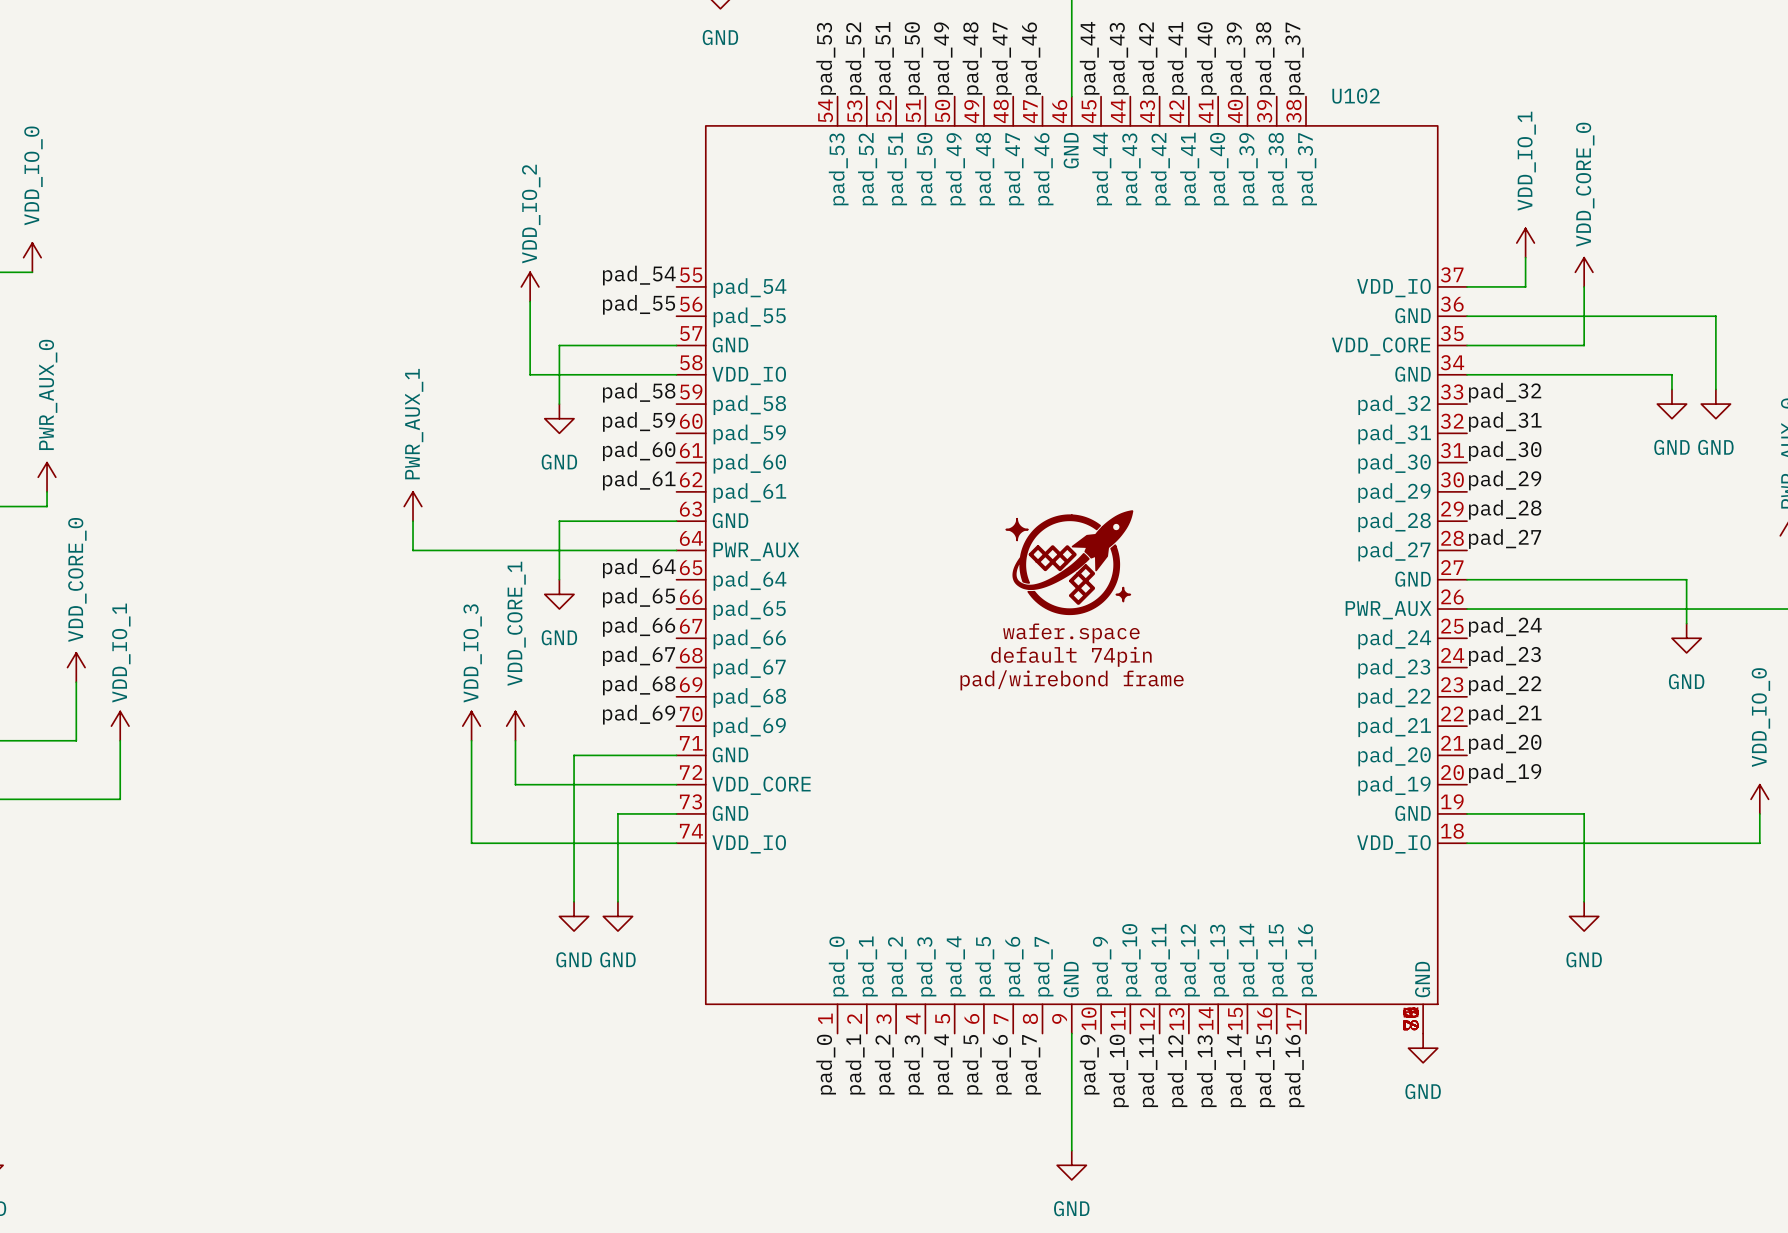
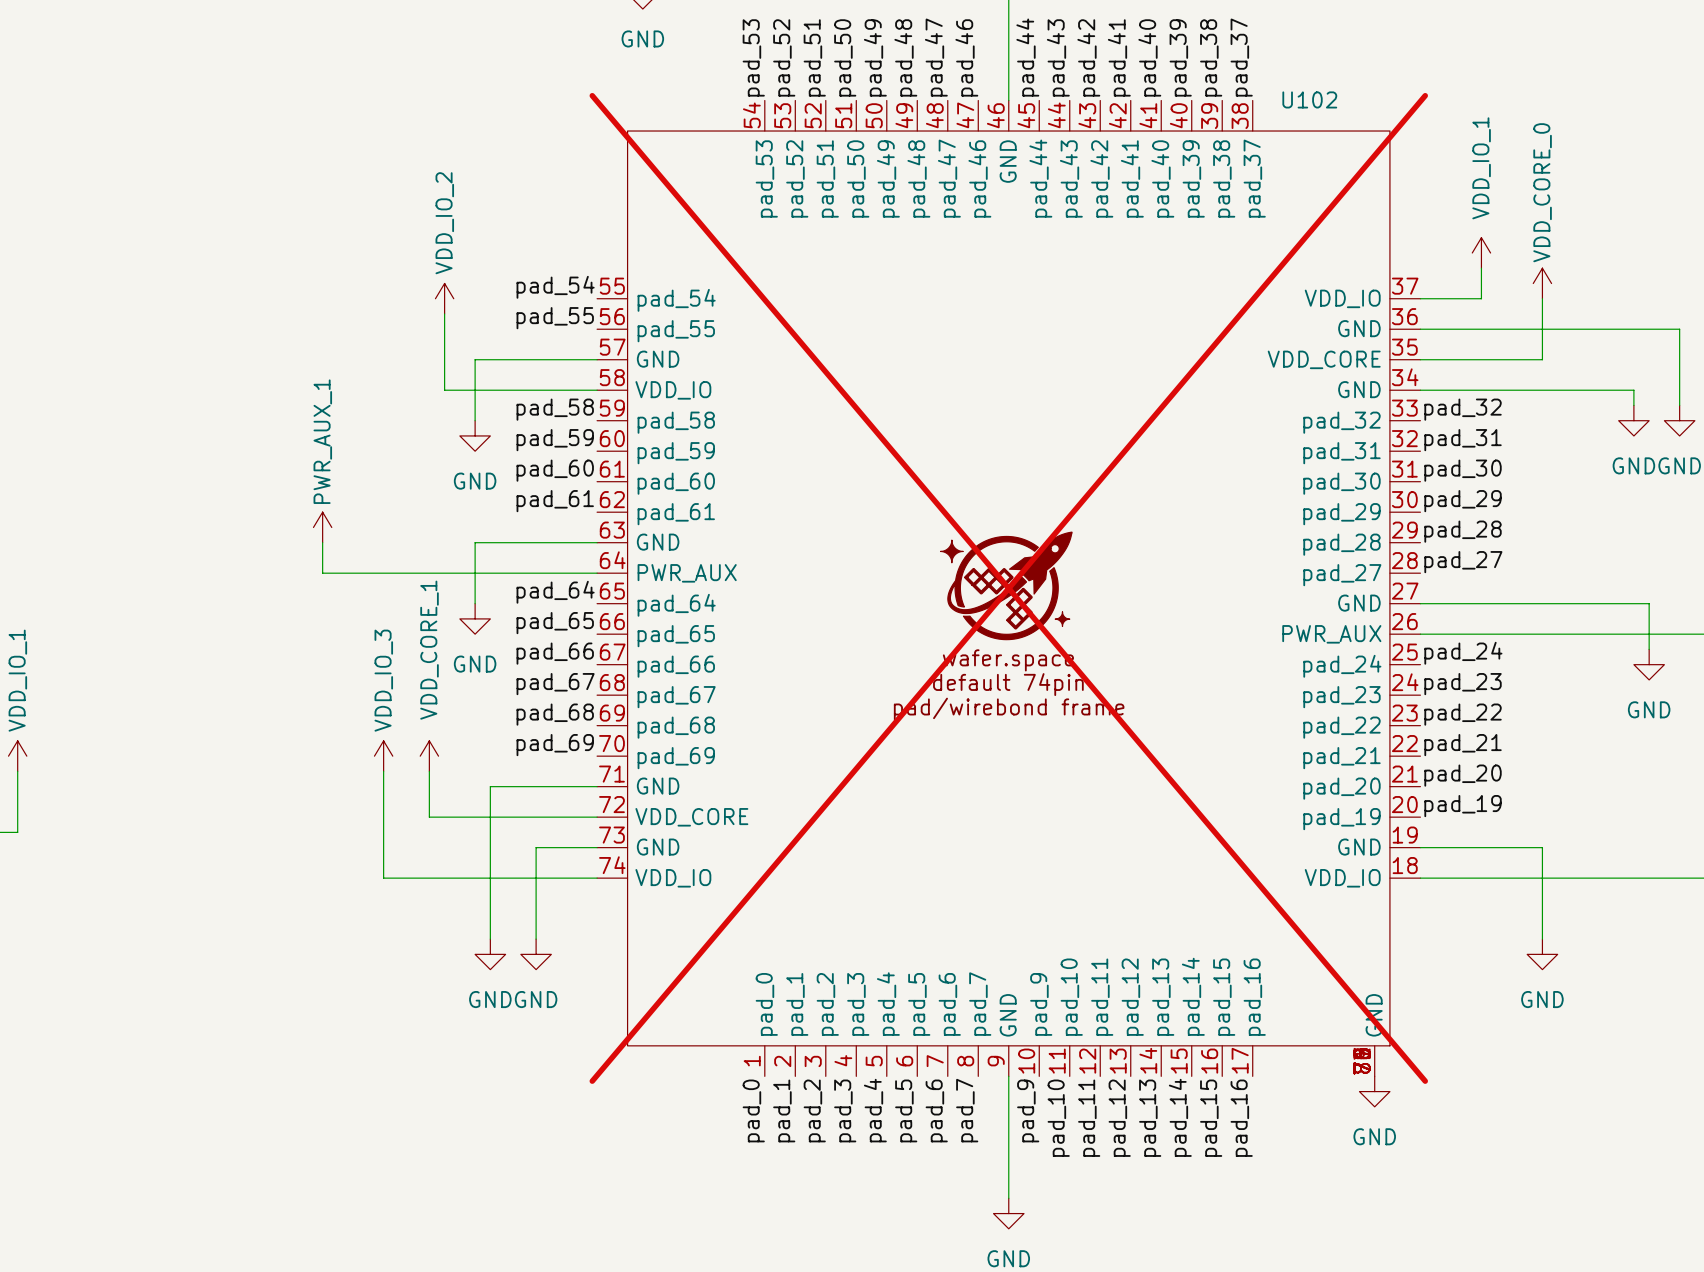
U102 do-not-place cross: none -> (1008, 588)

